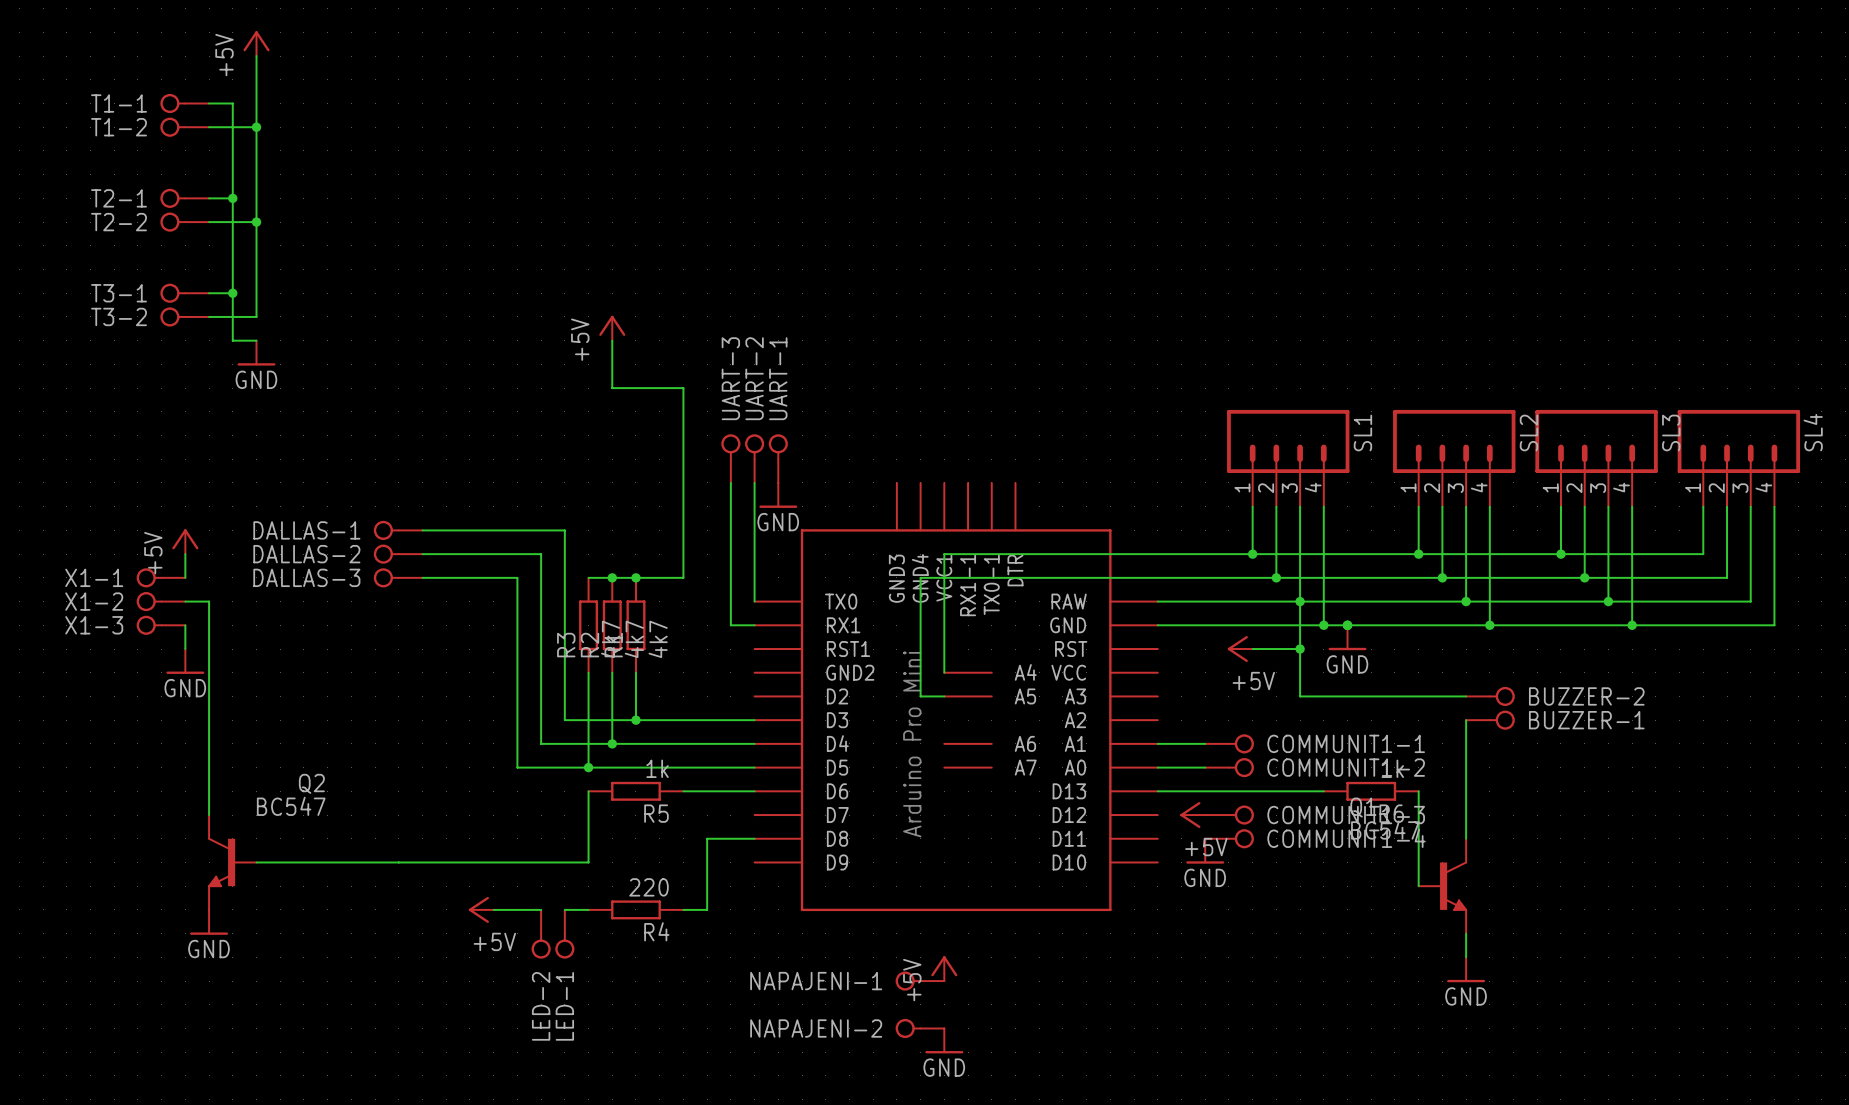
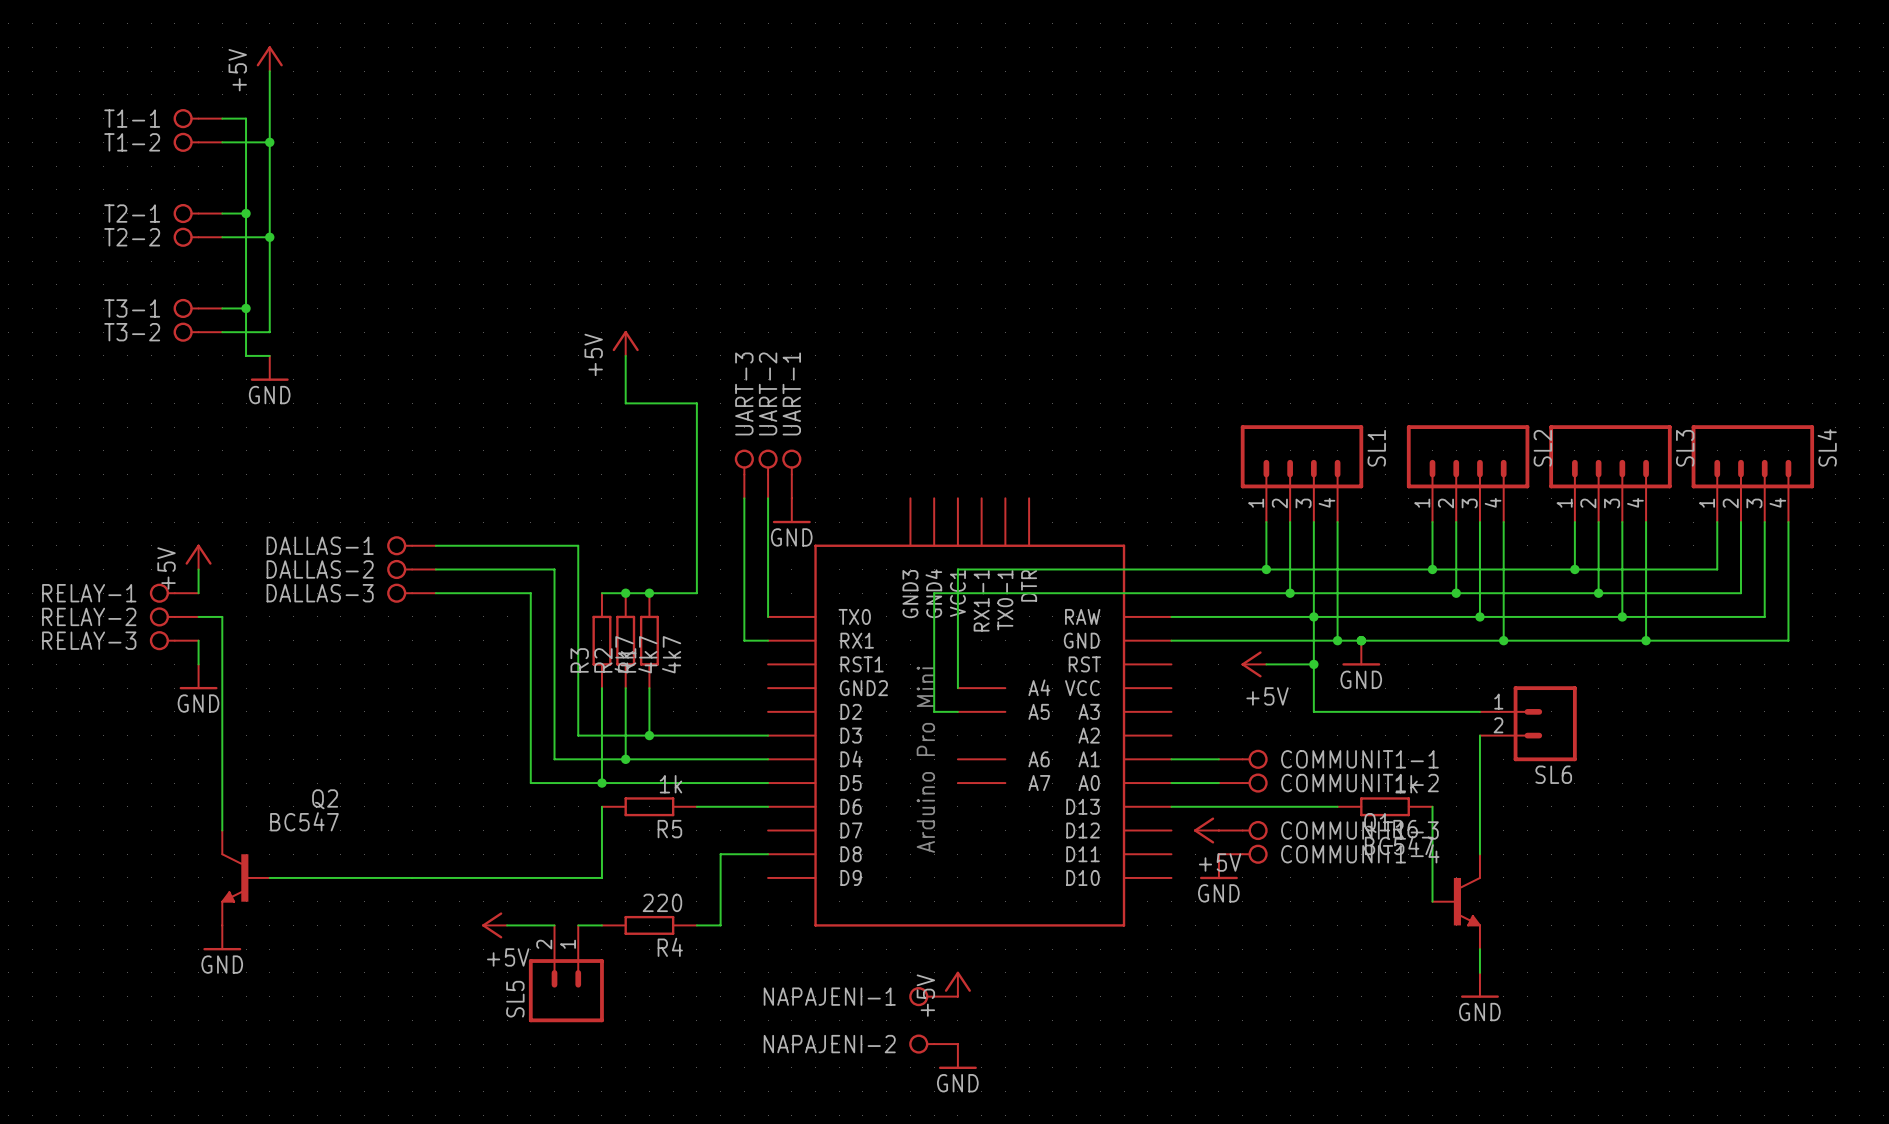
X1-1 name: X1-1 (94, 577) -> RELAY-1 (89, 593)
X1-2 name: X1-2 (94, 601) -> RELAY-2 (89, 616)
X1-3 name: X1-3 (94, 625) -> RELAY-3 (89, 640)
BUZZER-2: (1490, 696) -> none
SL6: none -> (1528, 723)
BUZZER-1: (1490, 720) -> none
LED-2: (541, 934) -> none
LED-1: (564, 934) -> none
SL5: none -> (566, 973)

